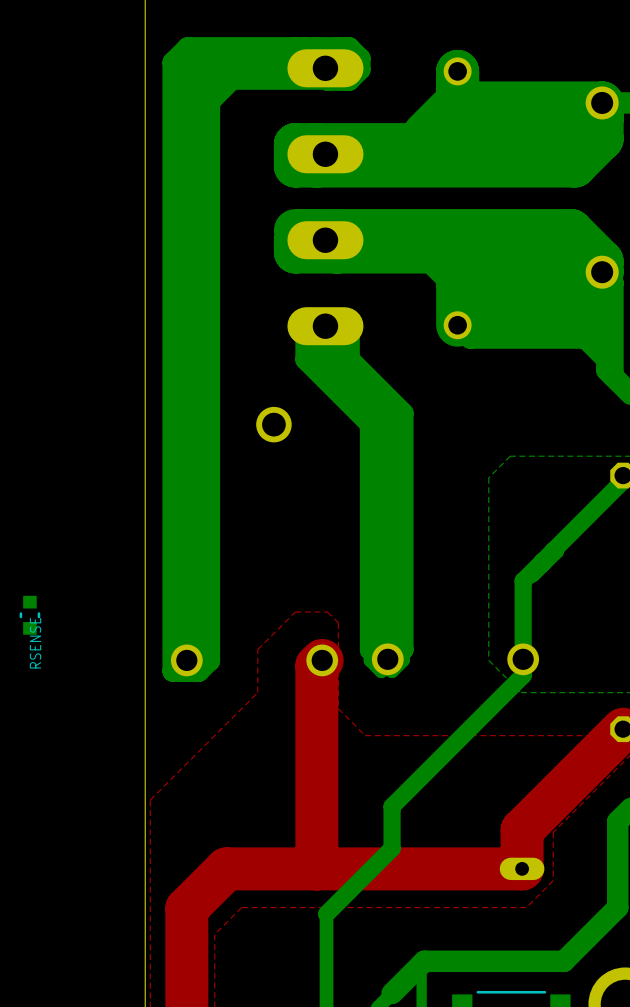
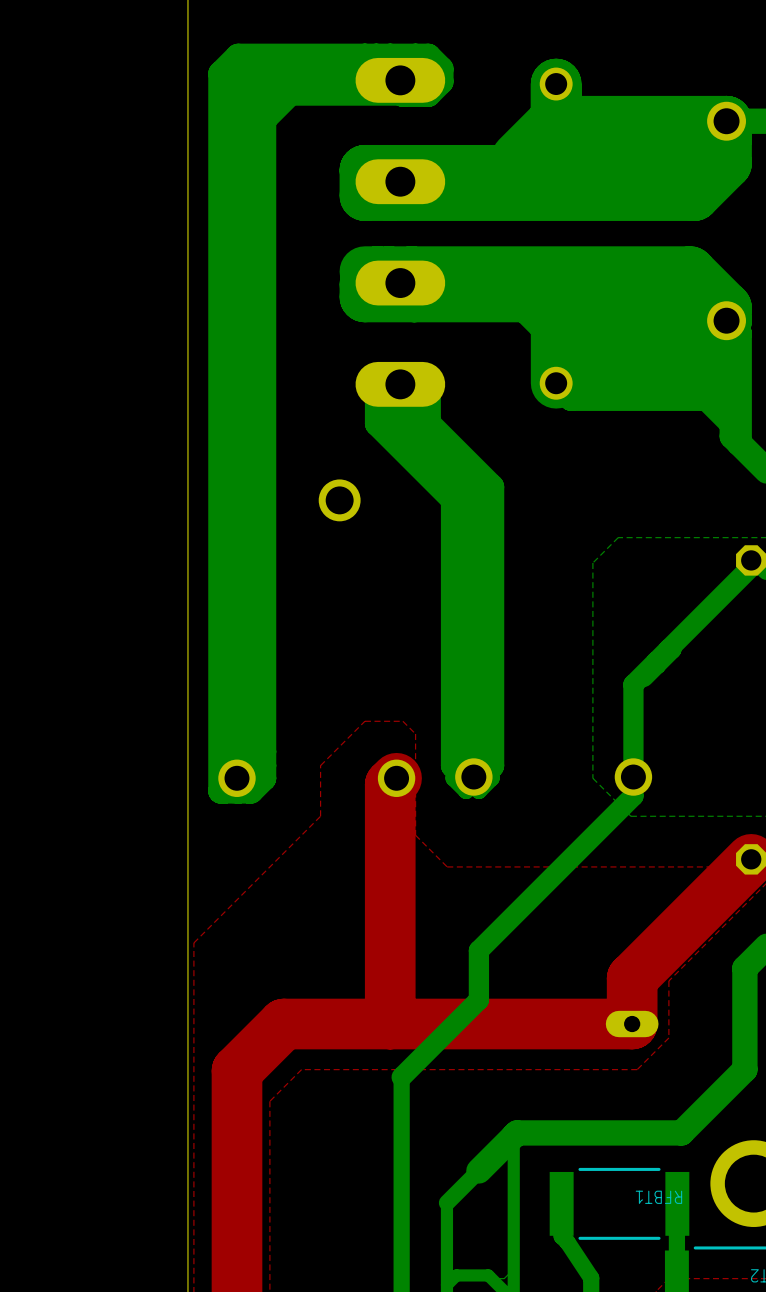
RSENSE: (29, 615) -> none

